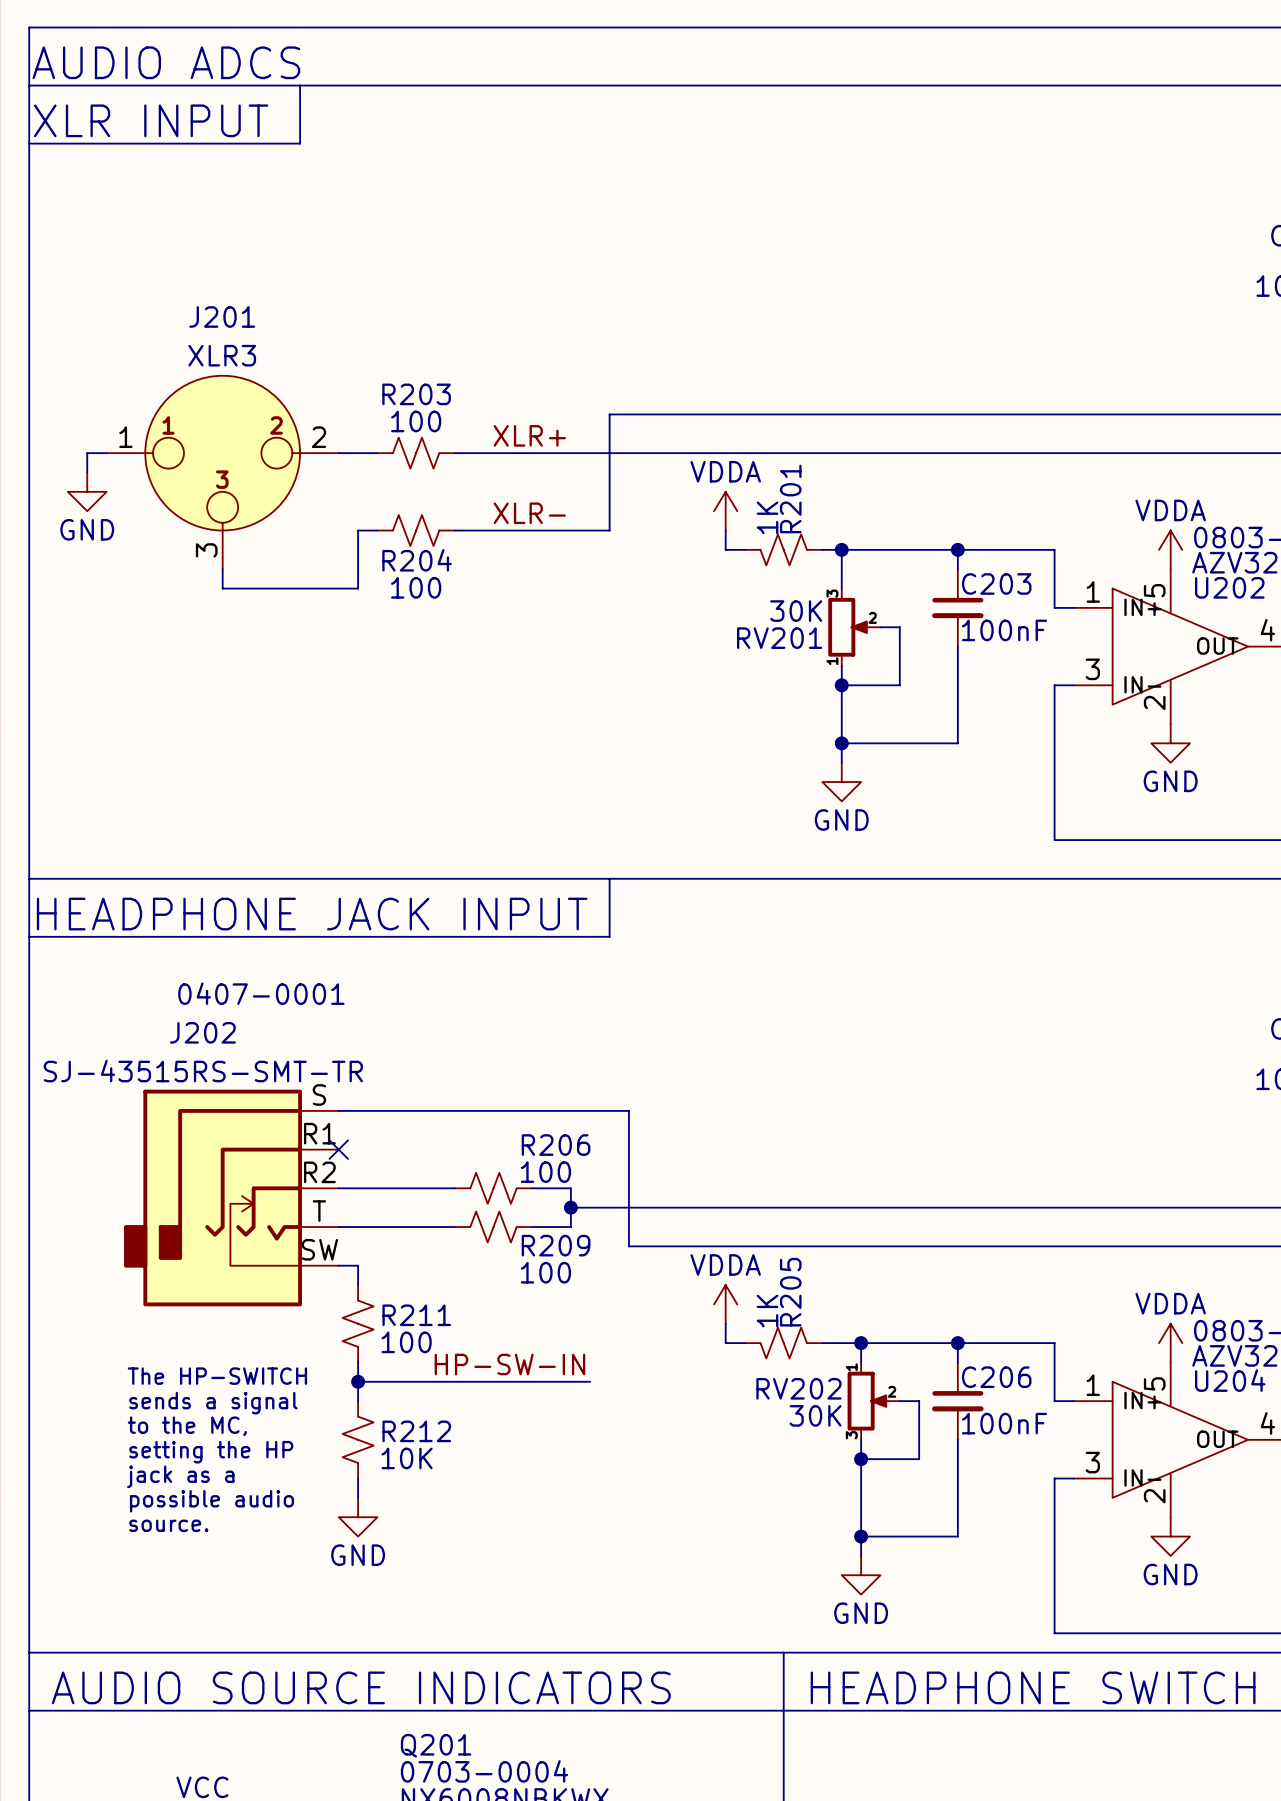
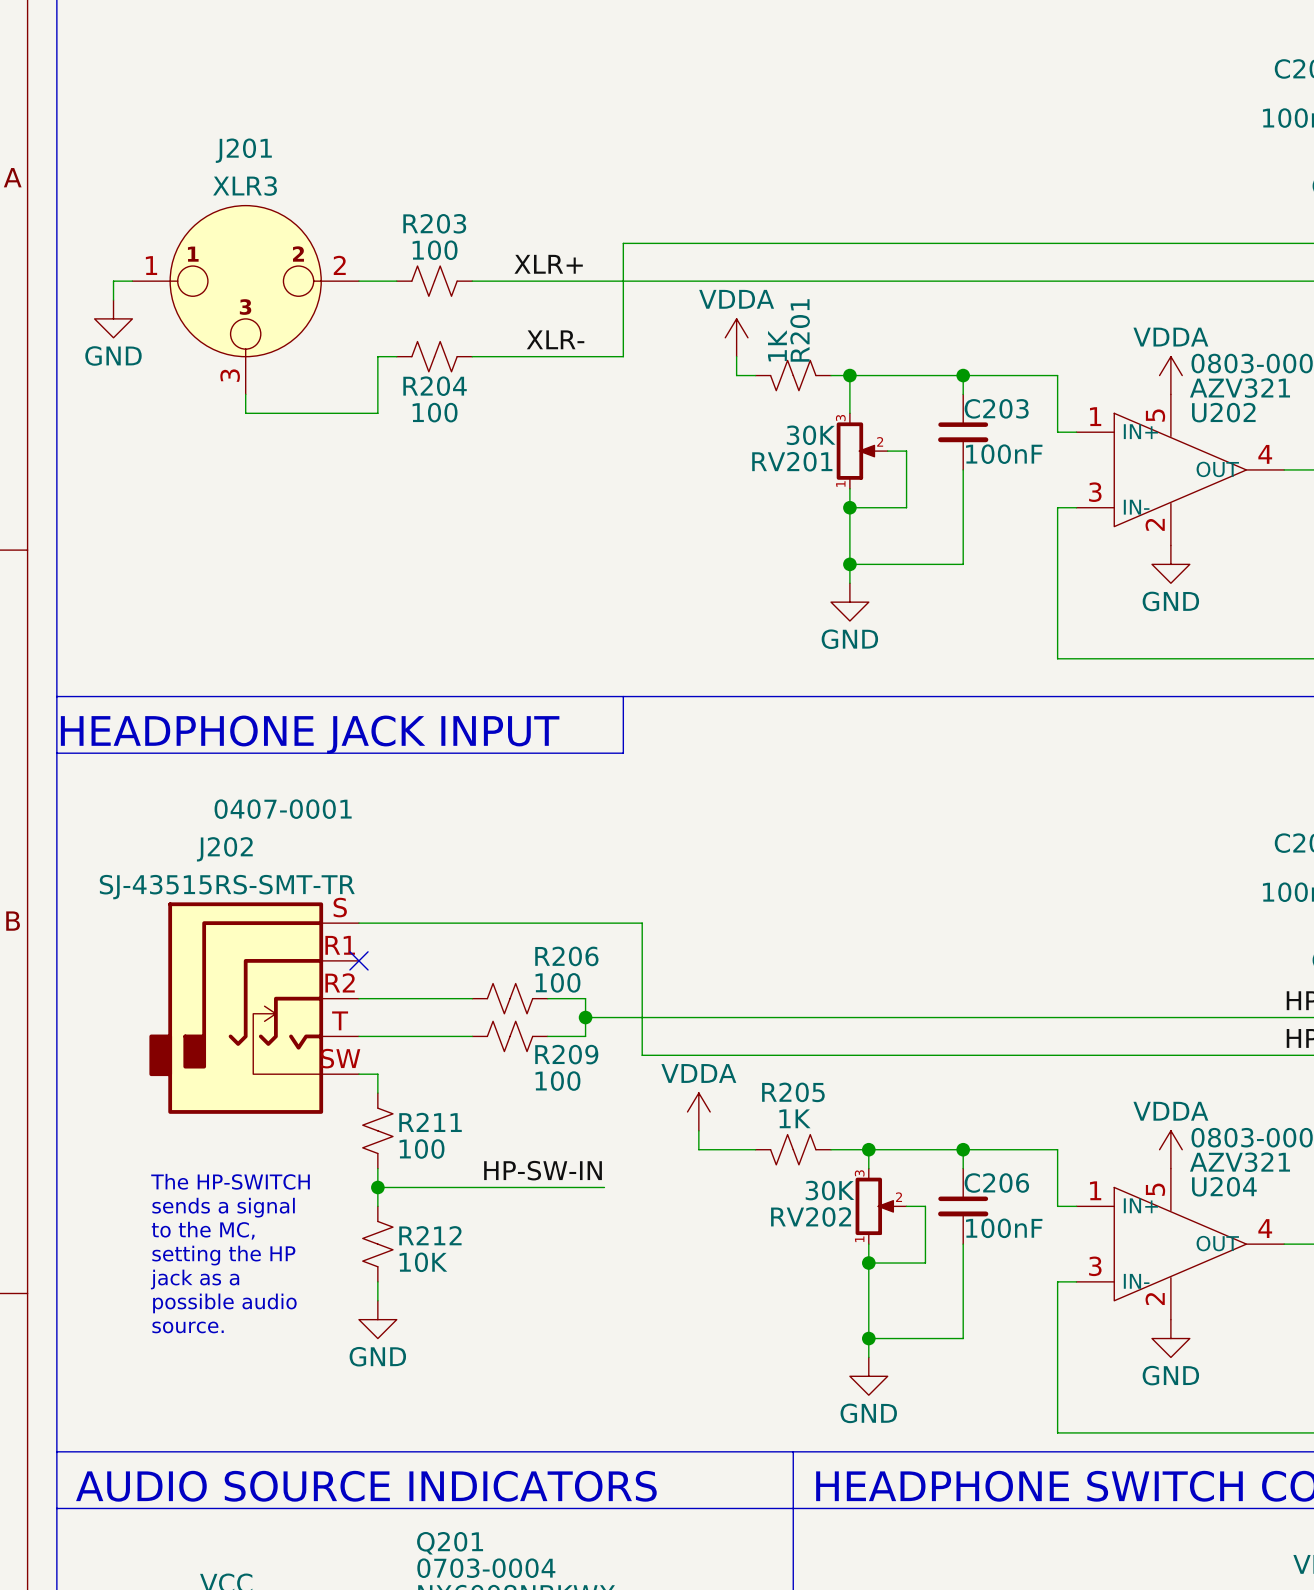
R205 name rotation: 0° (790, 1292) -> 90° clockwise (793, 1092)
power symbol position: VDDA (725, 1304) -> VDDA (698, 1111)
R205 value rotation: 0° (767, 1311) -> 90° clockwise (794, 1118)
wire: (725, 1323) (725, 1343) -> (698, 1130) (698, 1149) (736, 1149)
RV202 flip: as is (866, 1401) -> up-down (874, 1206)

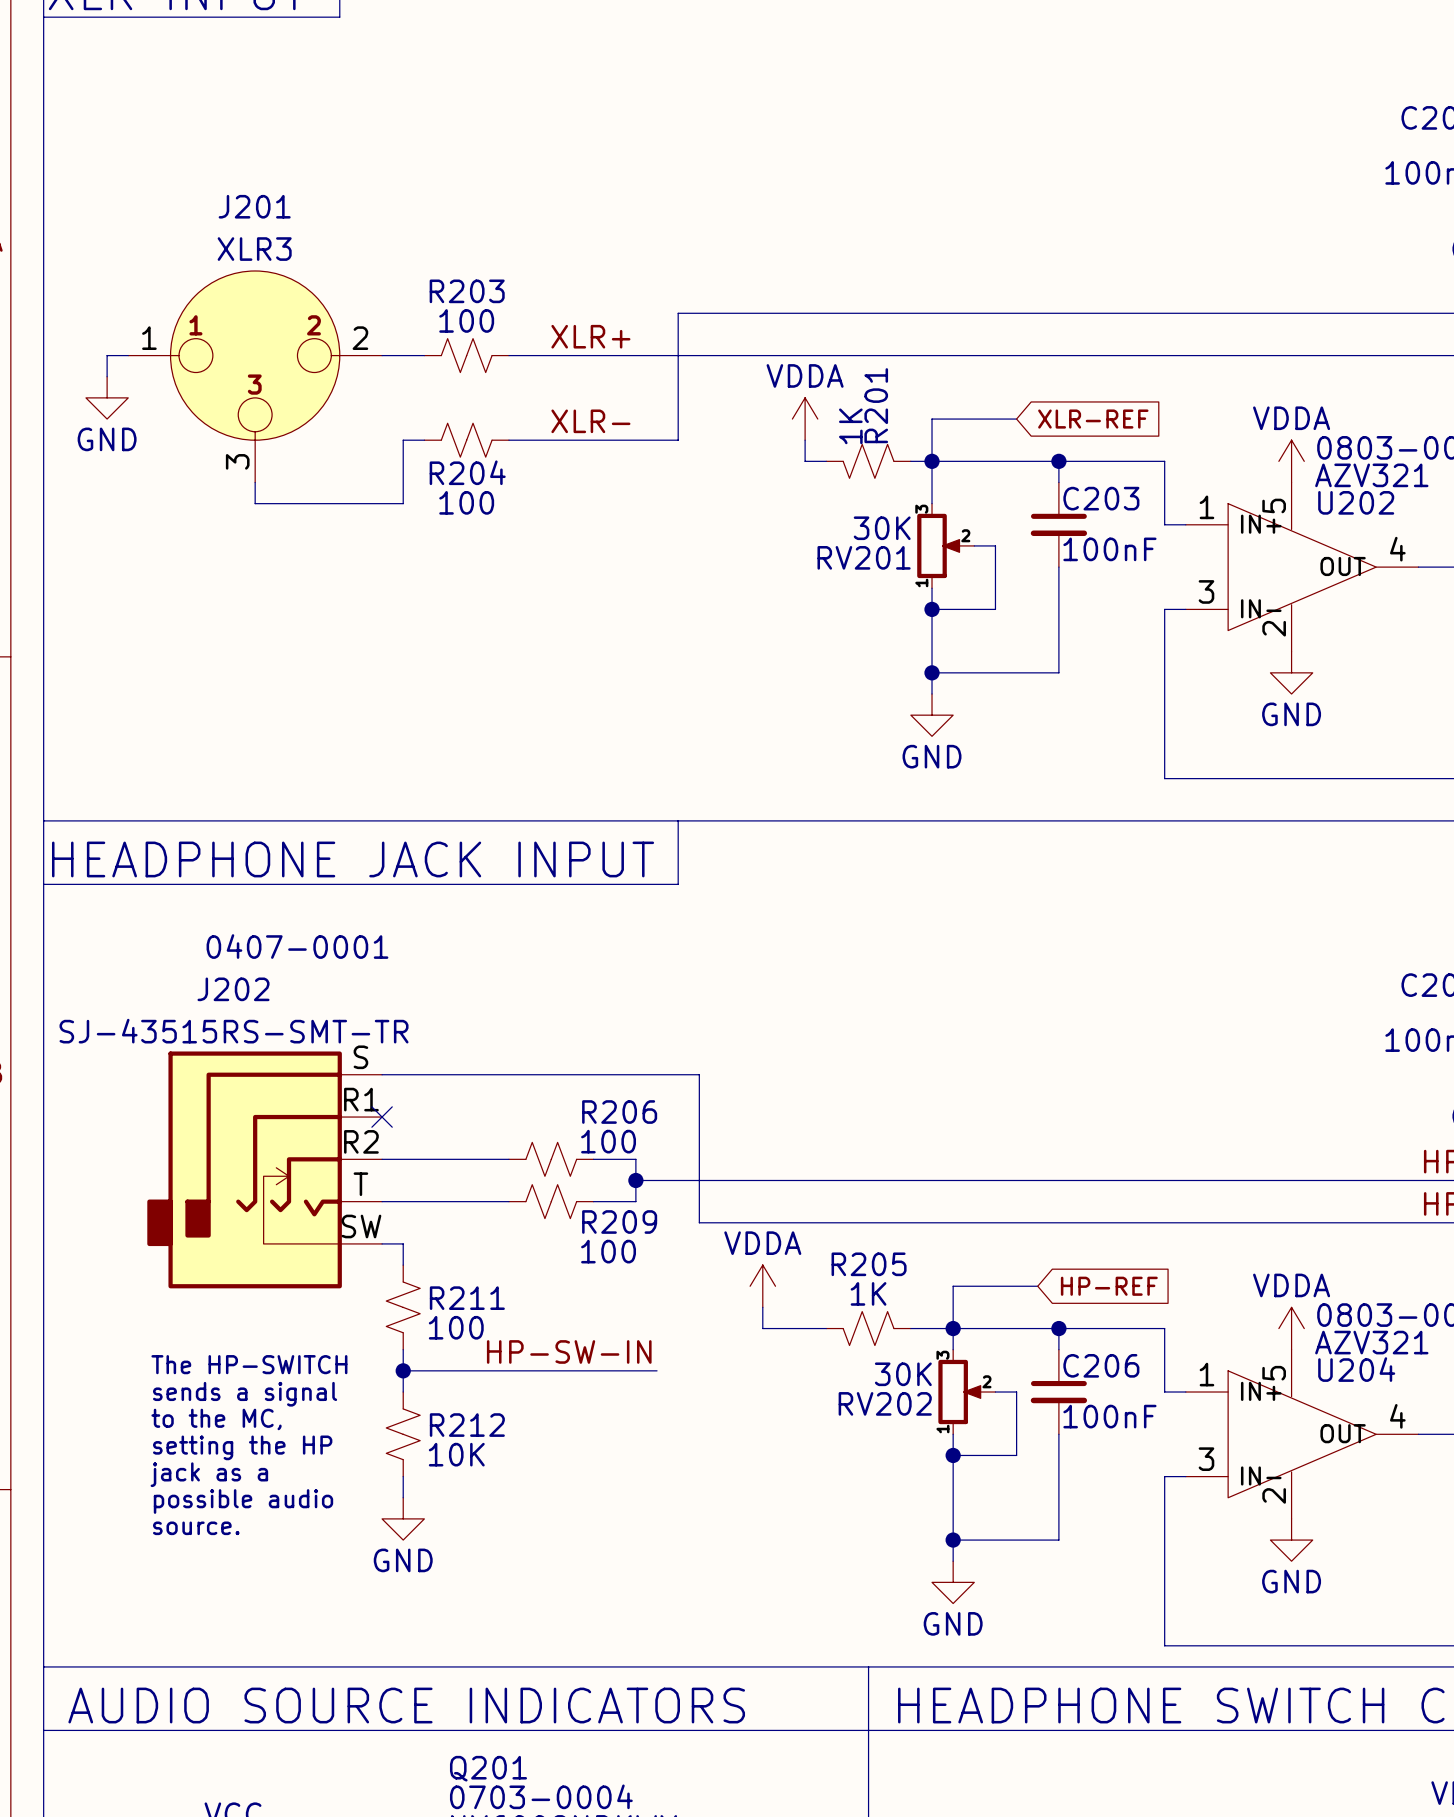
wire: none -> (1016, 419) (932, 419) (932, 461)
global label: none -> XLR-REF (1093, 419)
wire: none -> (1037, 1286) (953, 1286) (953, 1328)
global label: none -> HP-REF (1109, 1286)

